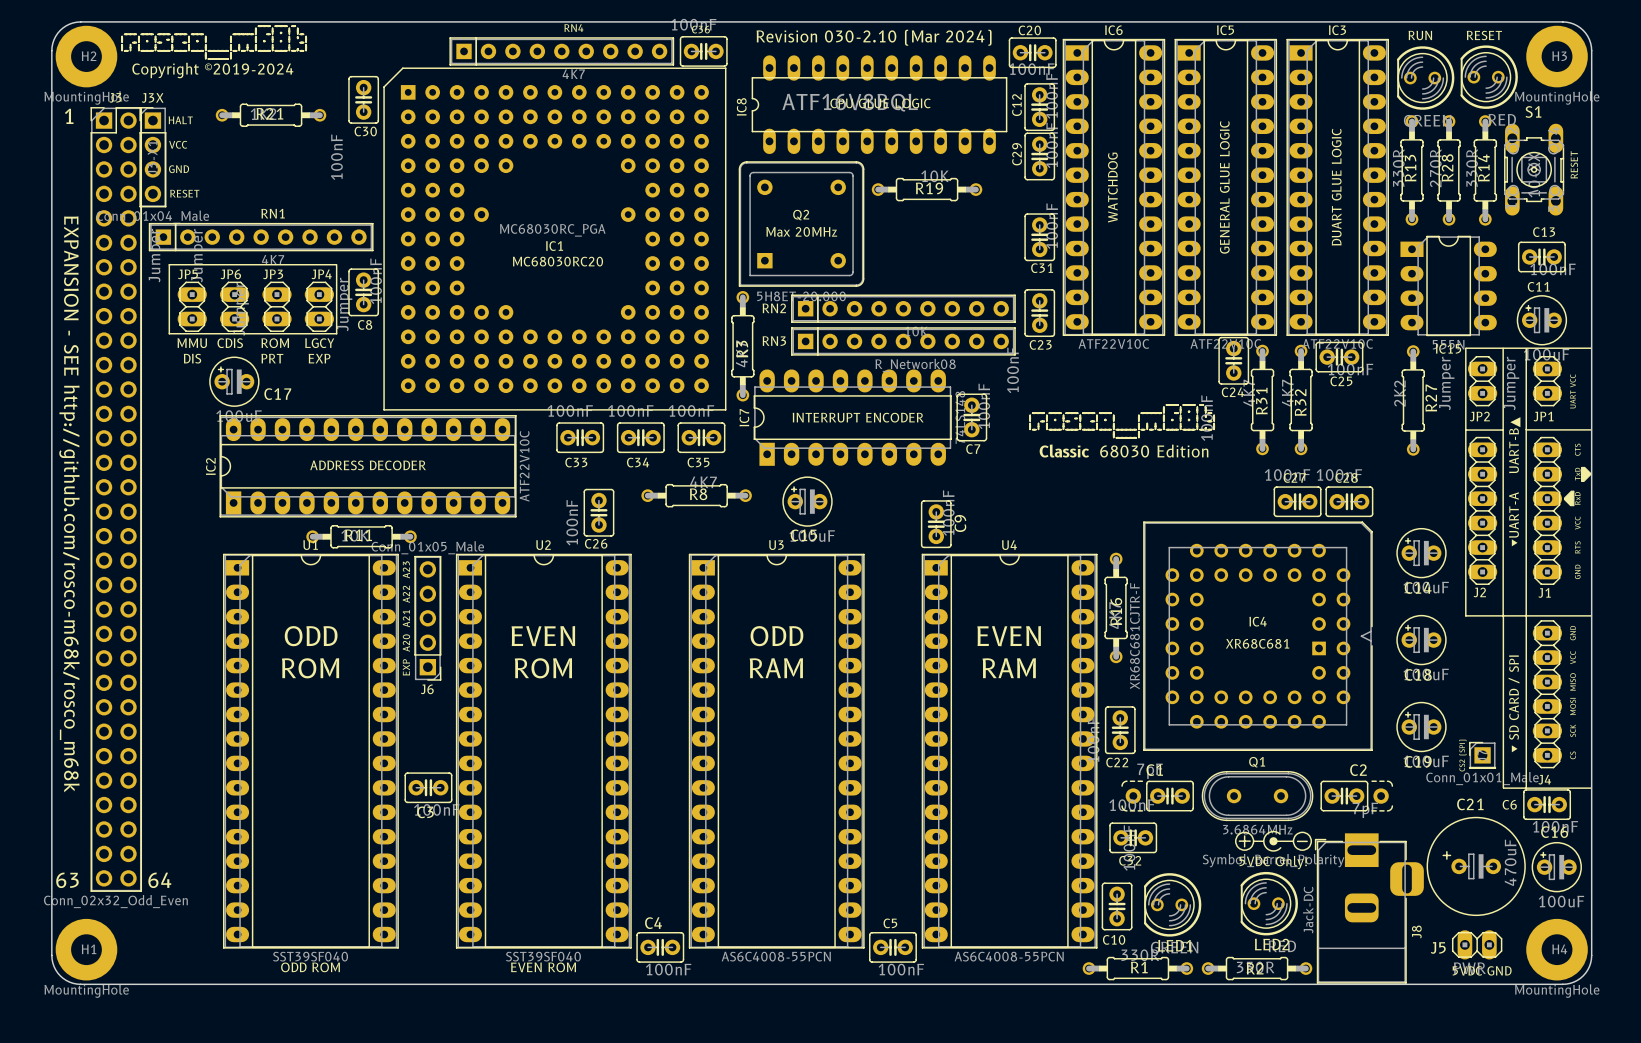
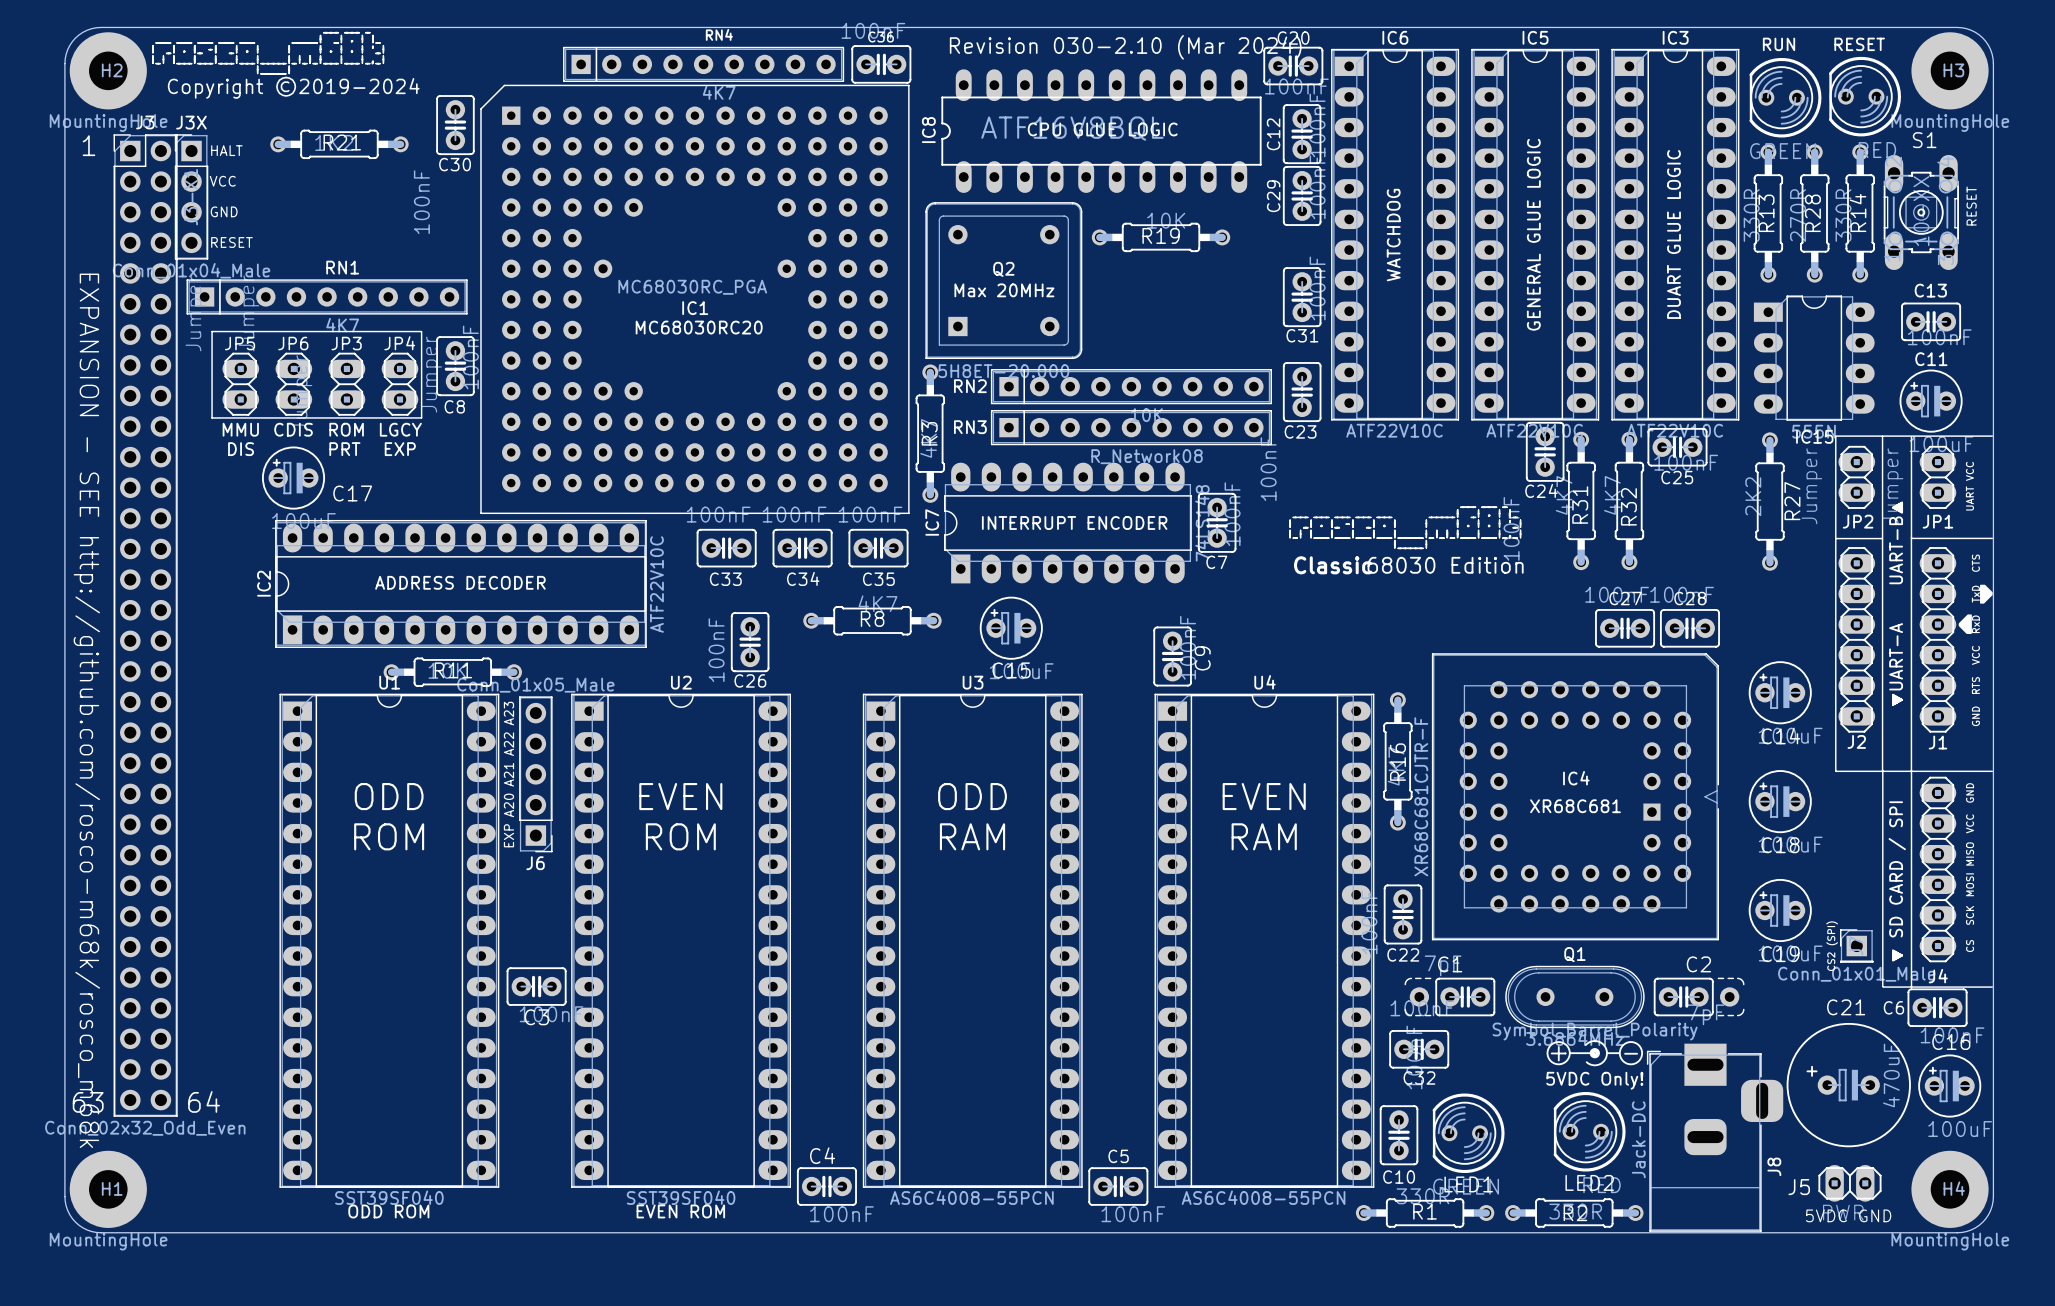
drawing shape: [1202, 830, 1345, 868] -> [1492, 1022, 1698, 1067]

